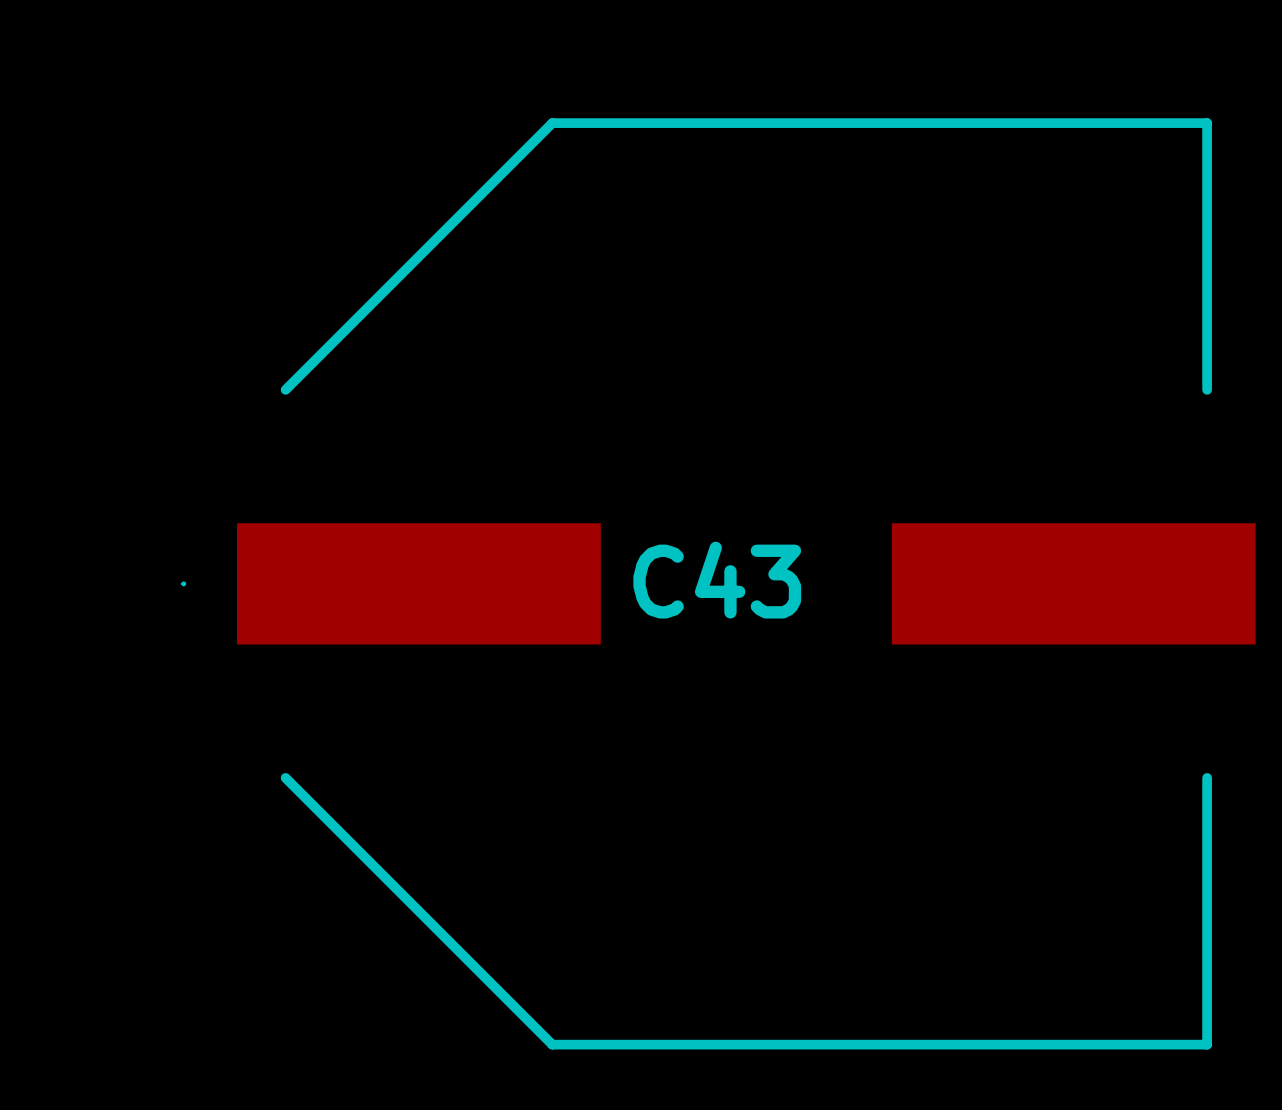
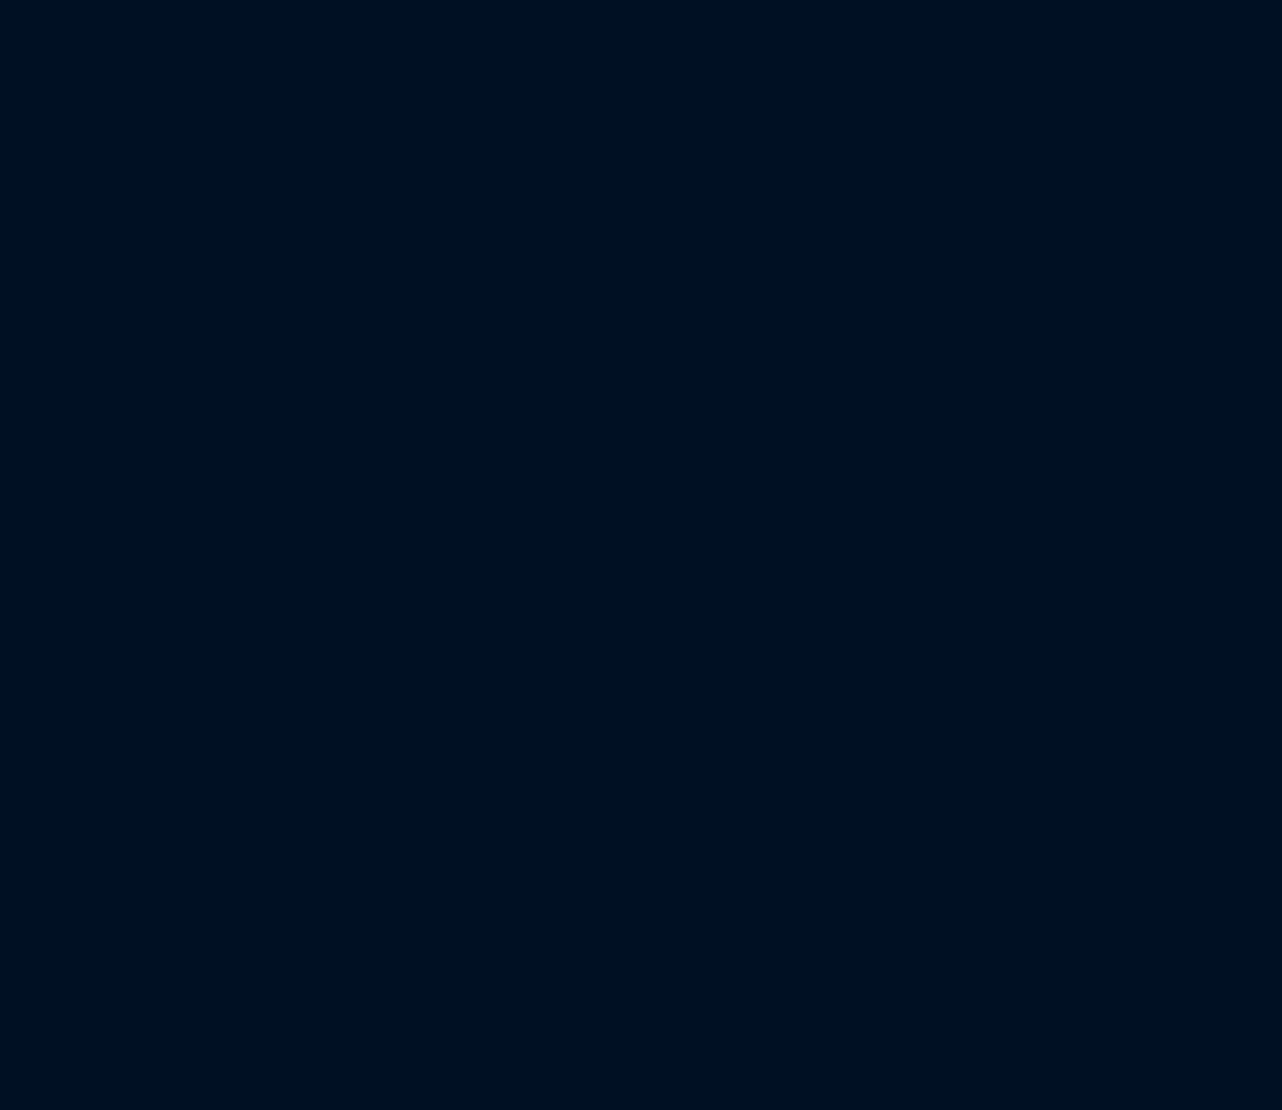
C43: (718, 583) -> none

